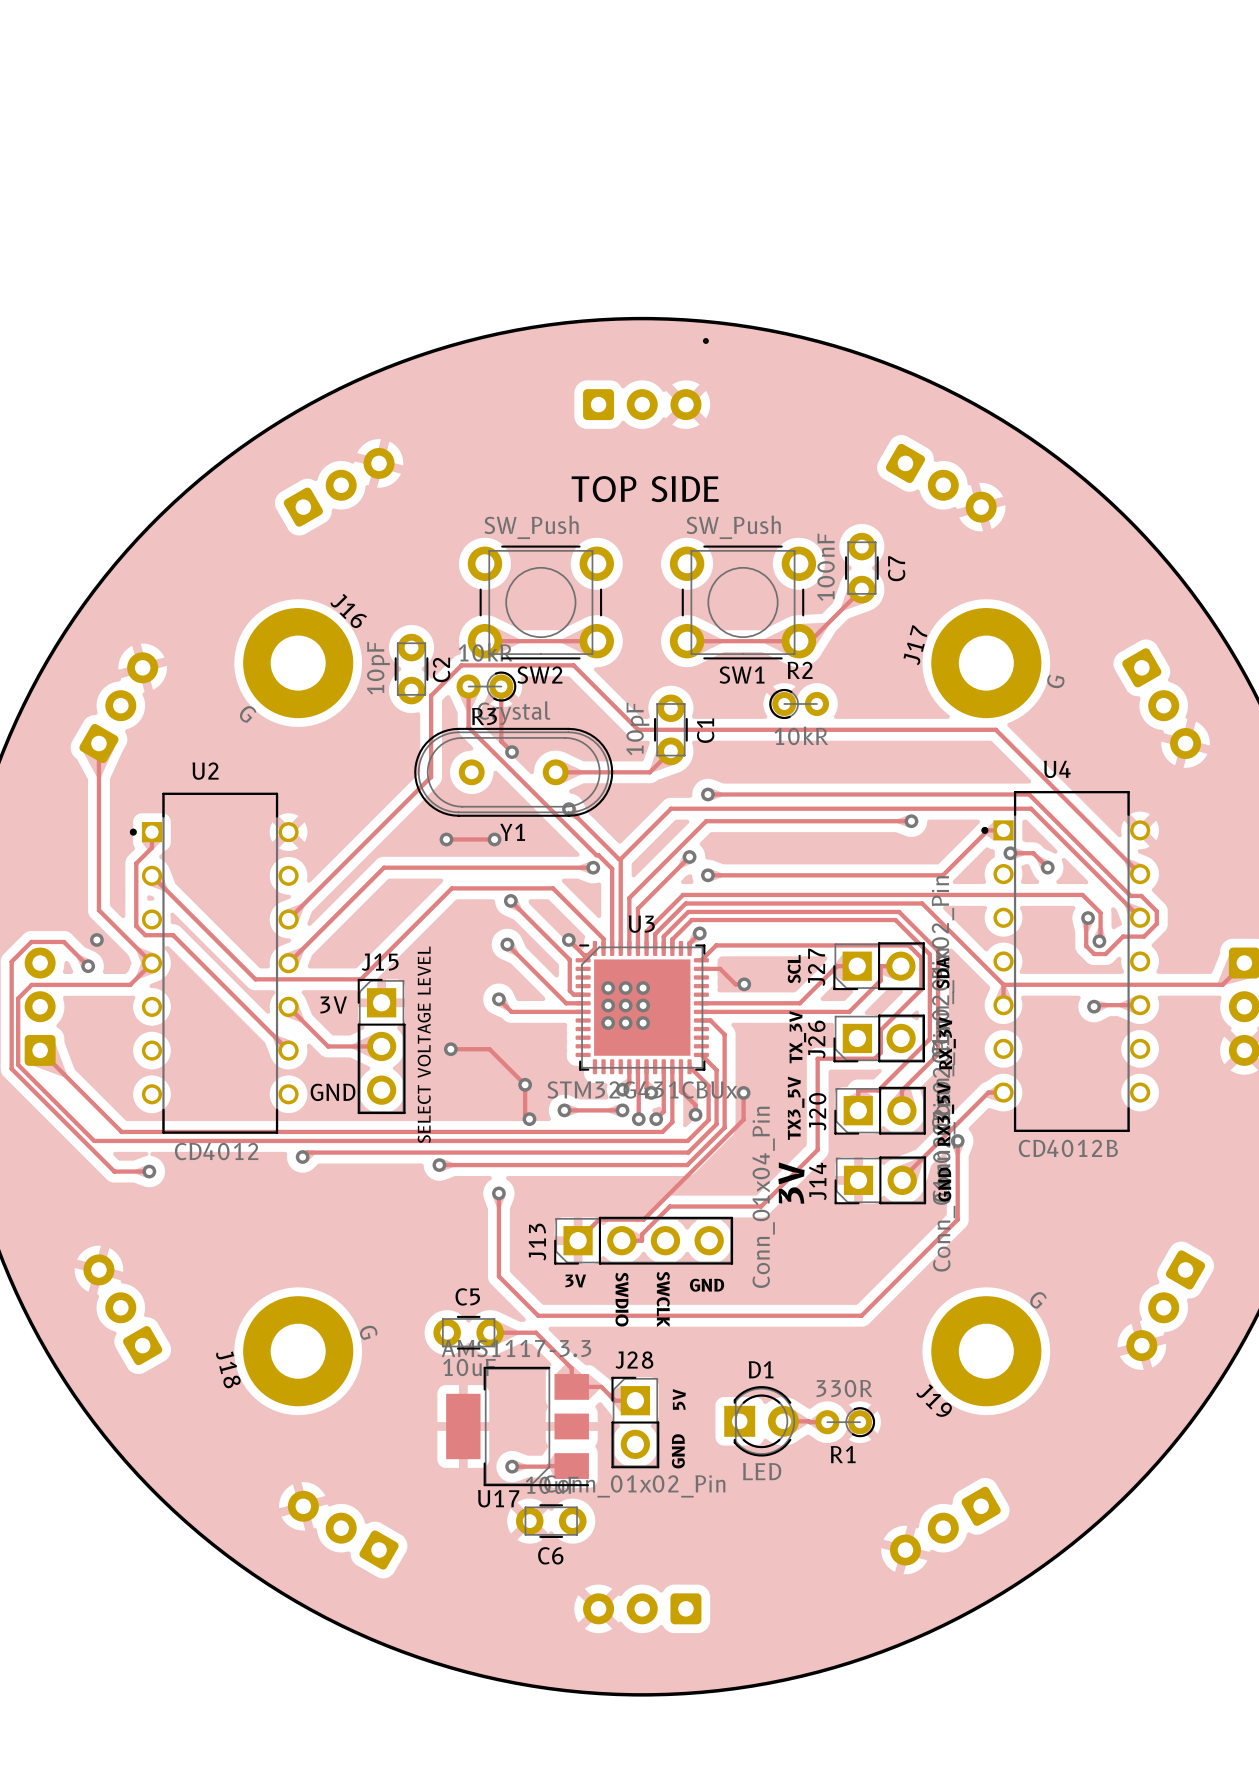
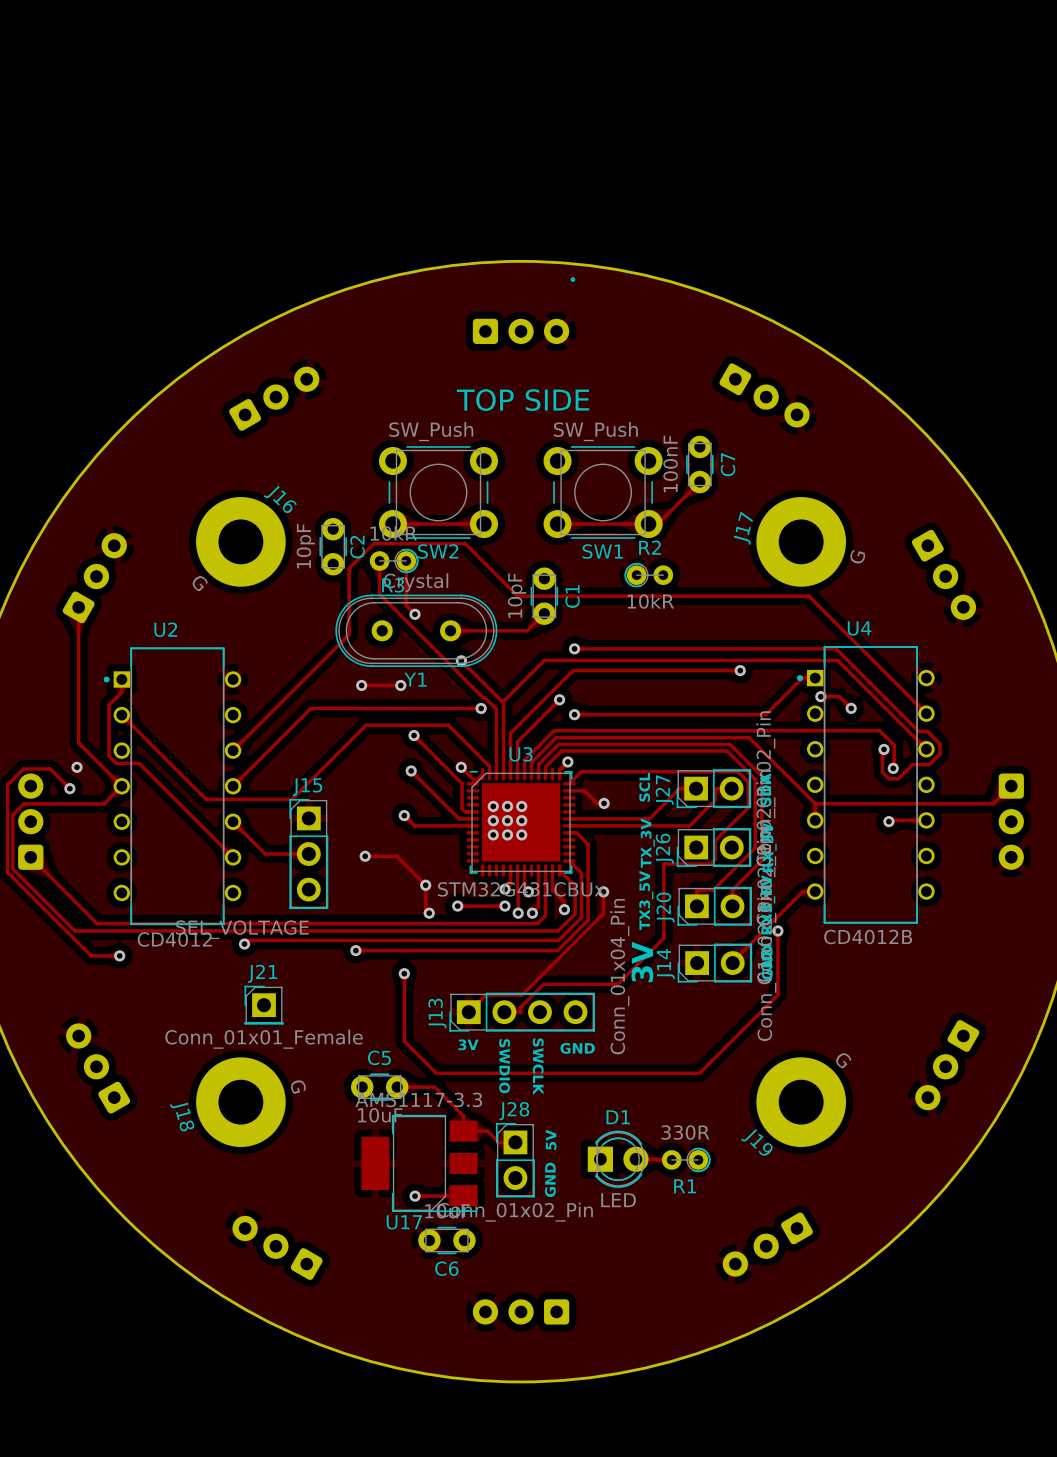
text: 3V (333, 1004) -> none
J15 value: SELECT VOLTAGE LEVEL (424, 1044) -> SEL_VOLTAGE (242, 929)
text: GND (333, 1092) -> none
J21: none -> Conn_01x01_Female (264, 1005)

